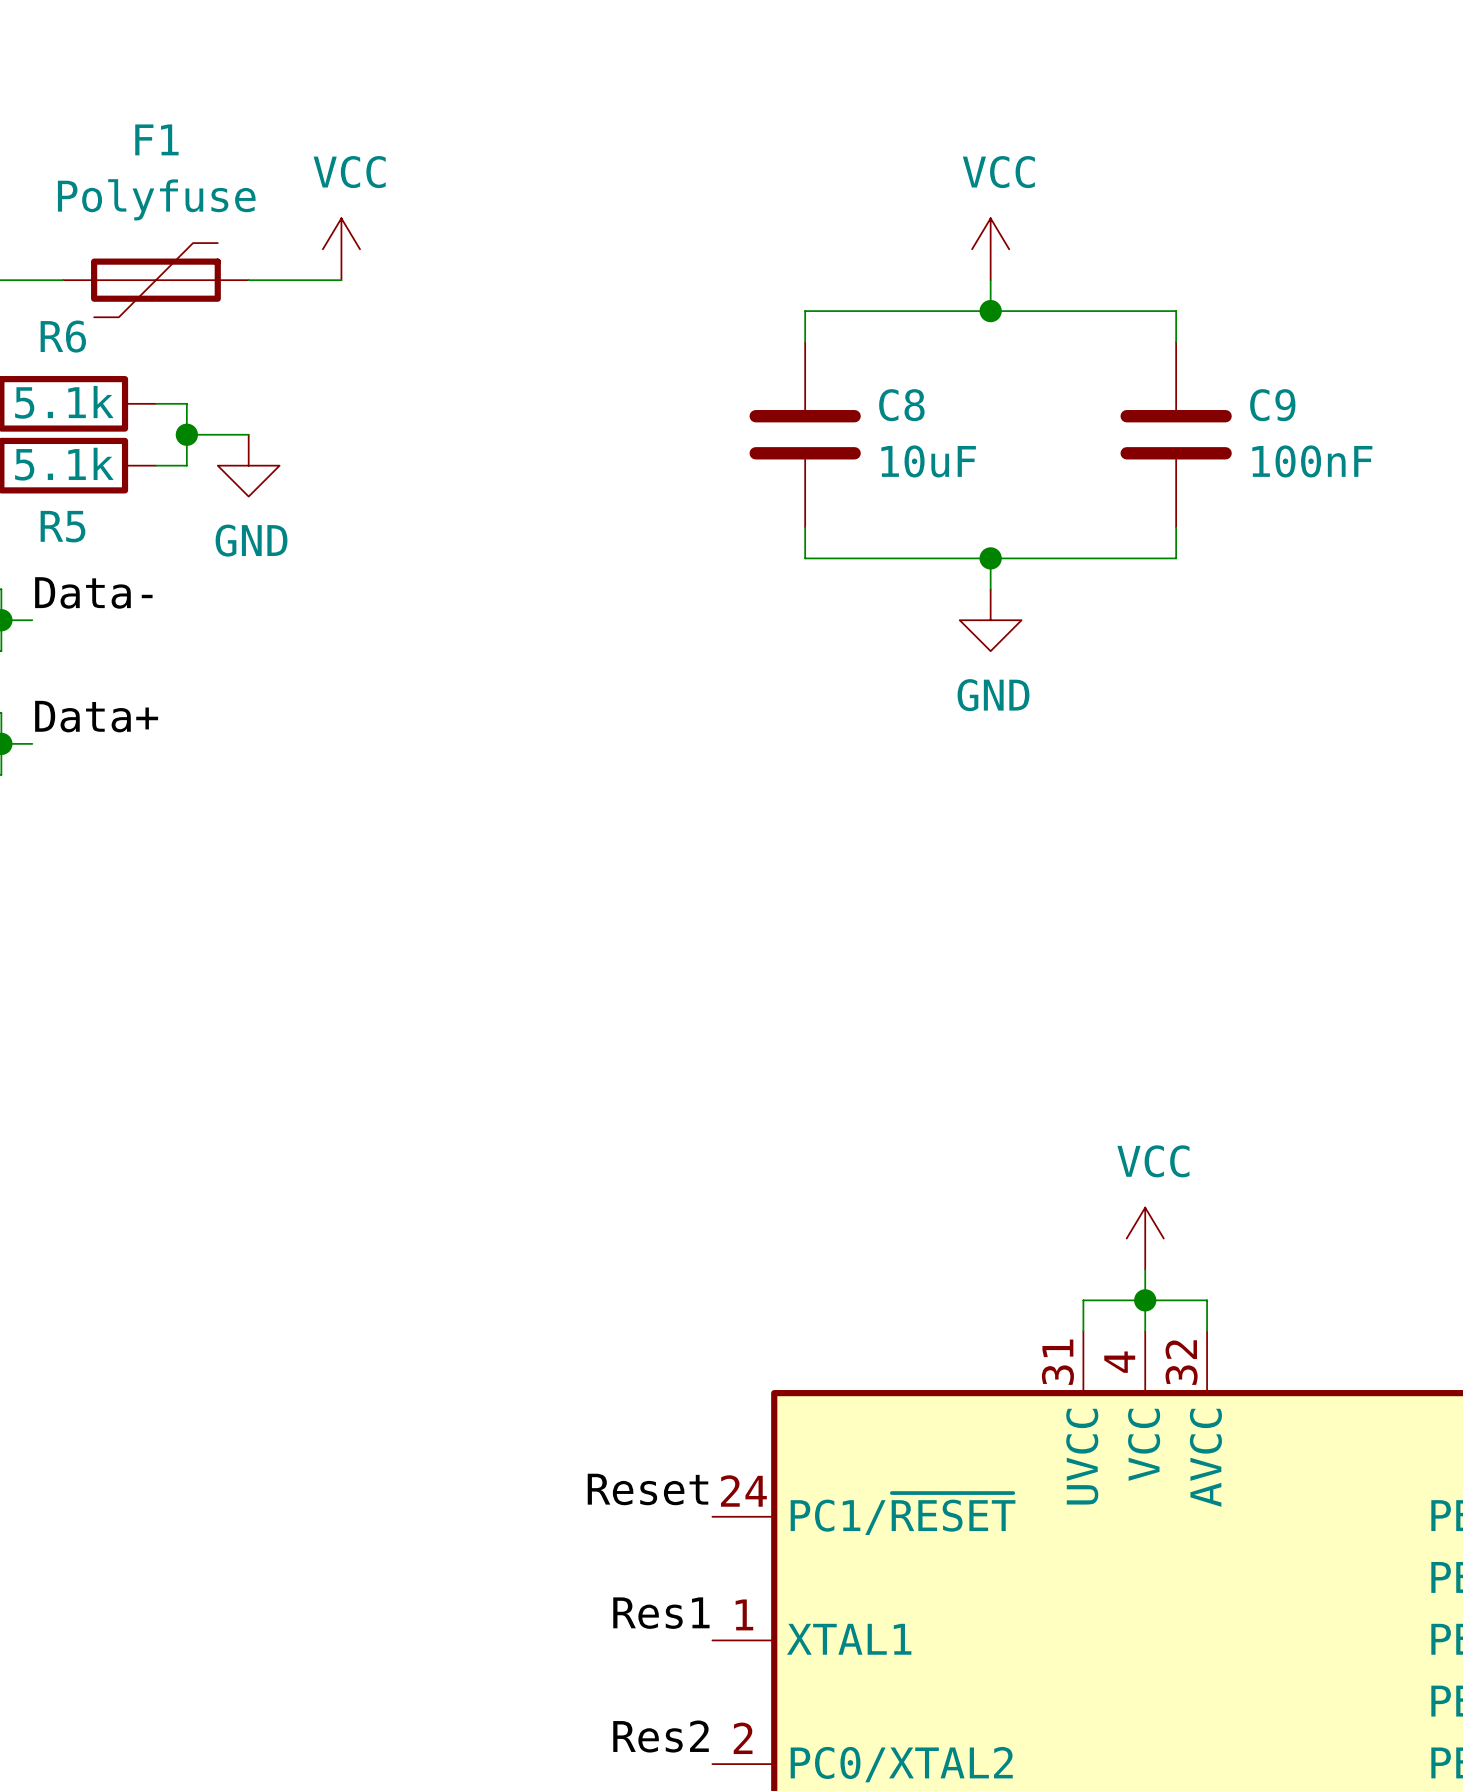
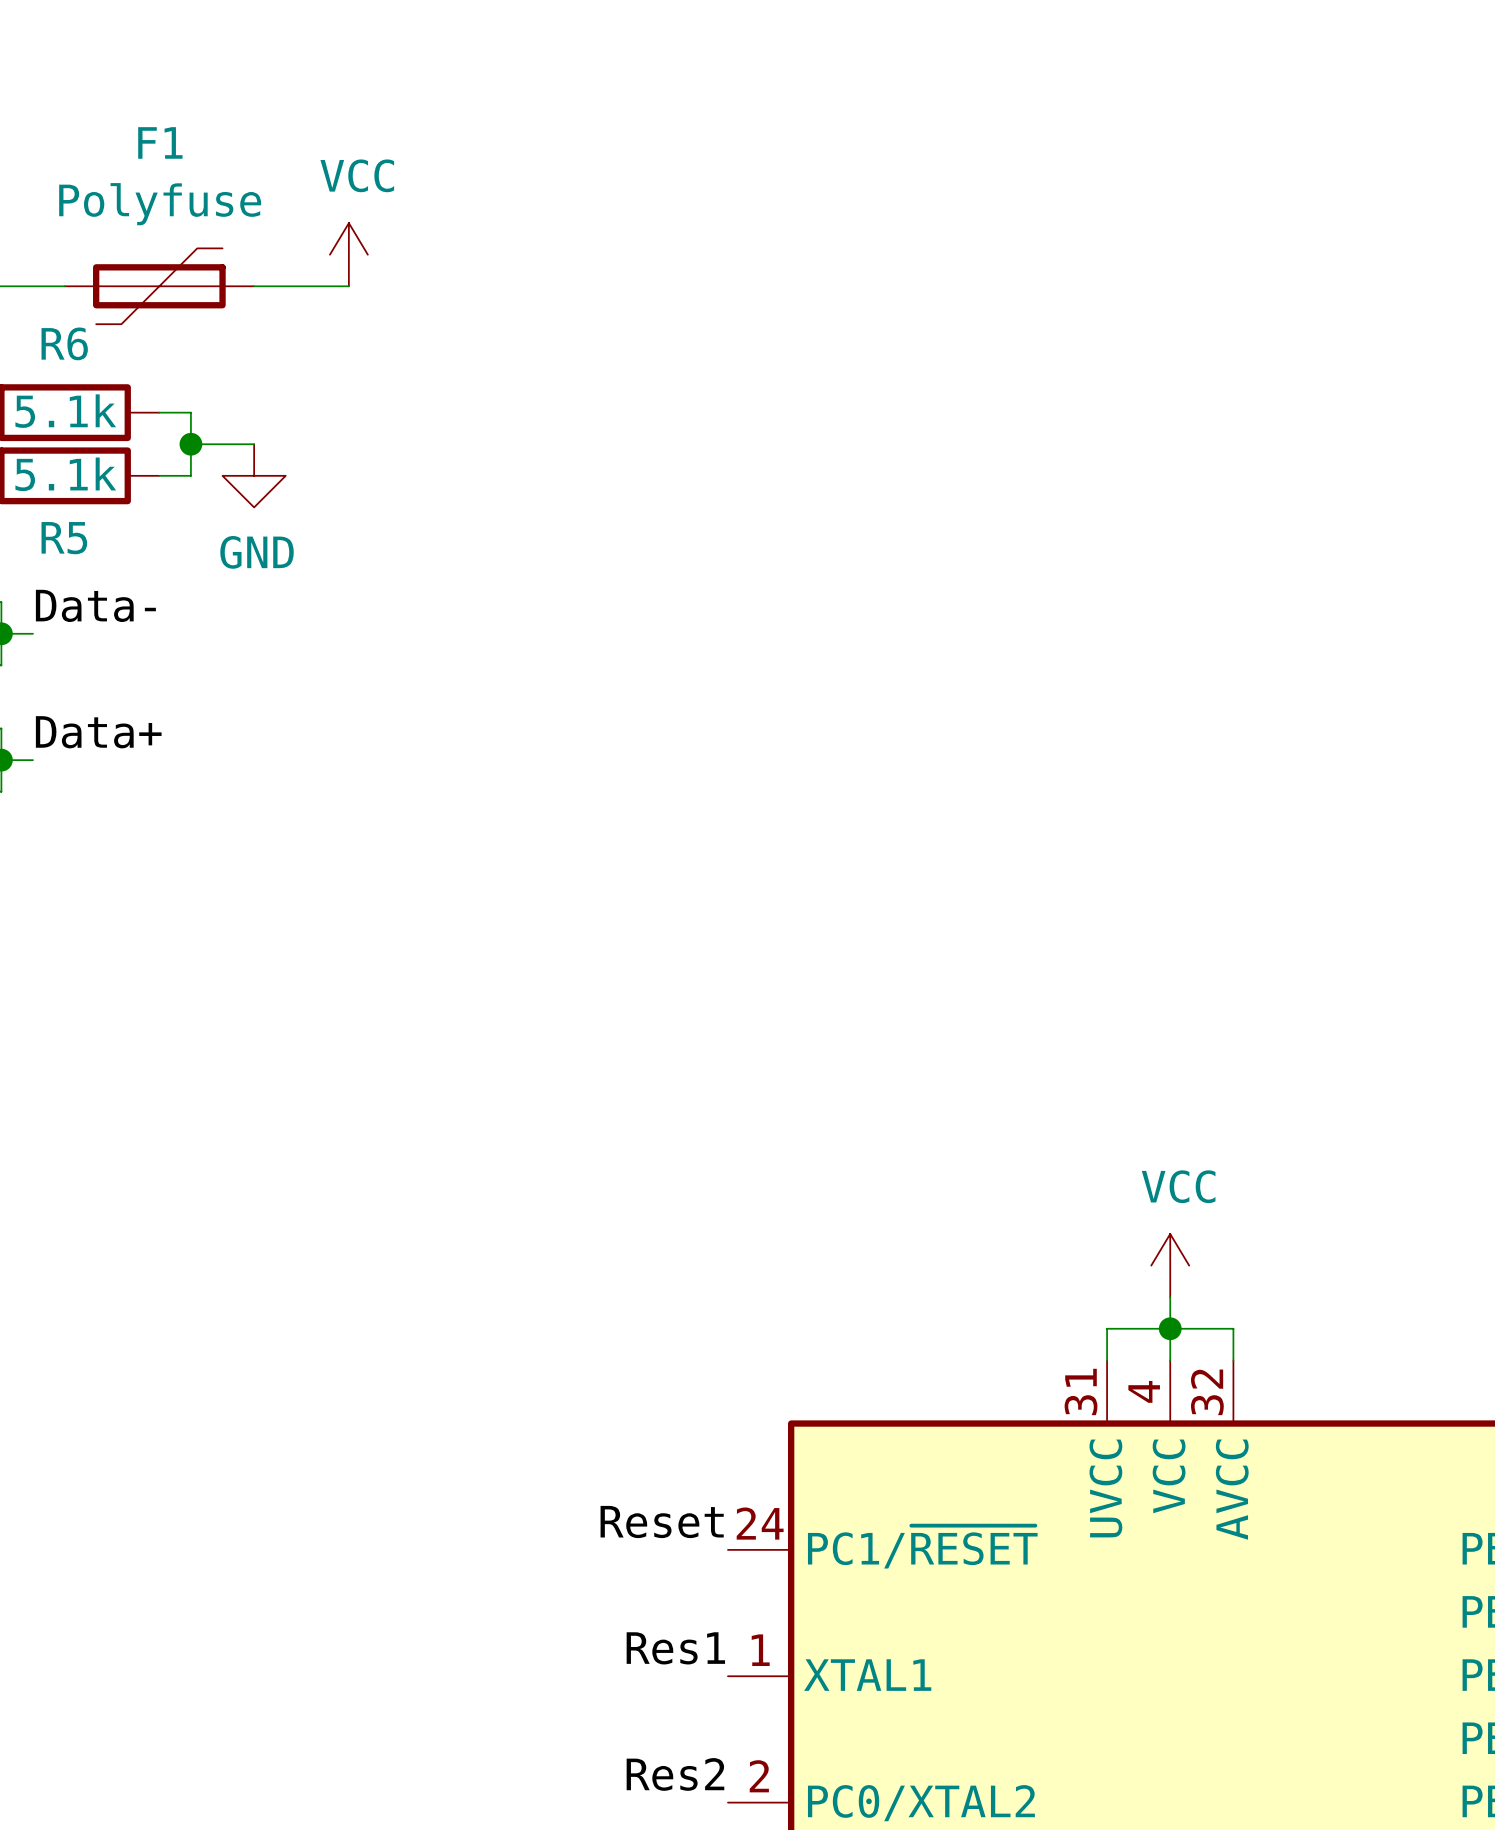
power symbol: VCC (990, 249) -> none
wire: (990, 280) (990, 311) -> none
junction: (990, 311) -> none
wire: (805, 342) (805, 311) (1176, 311) (1176, 342) -> none
C8: 10uF (805, 434) -> none
C9: 100nF (1176, 434) -> none
wire: (805, 527) (805, 558) (1176, 558) (1176, 527) -> none
wire: (990, 558) (990, 589) -> none
junction: (990, 558) -> none
power symbol: GND (990, 620) -> none

